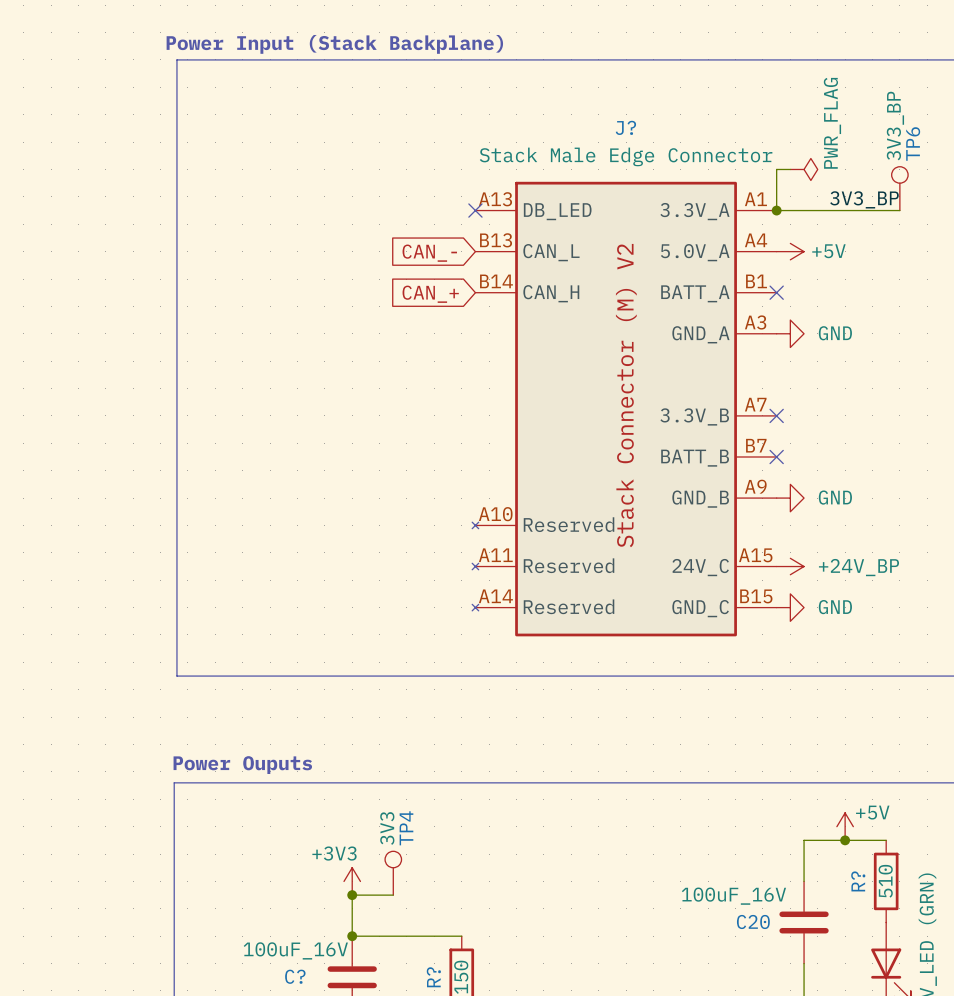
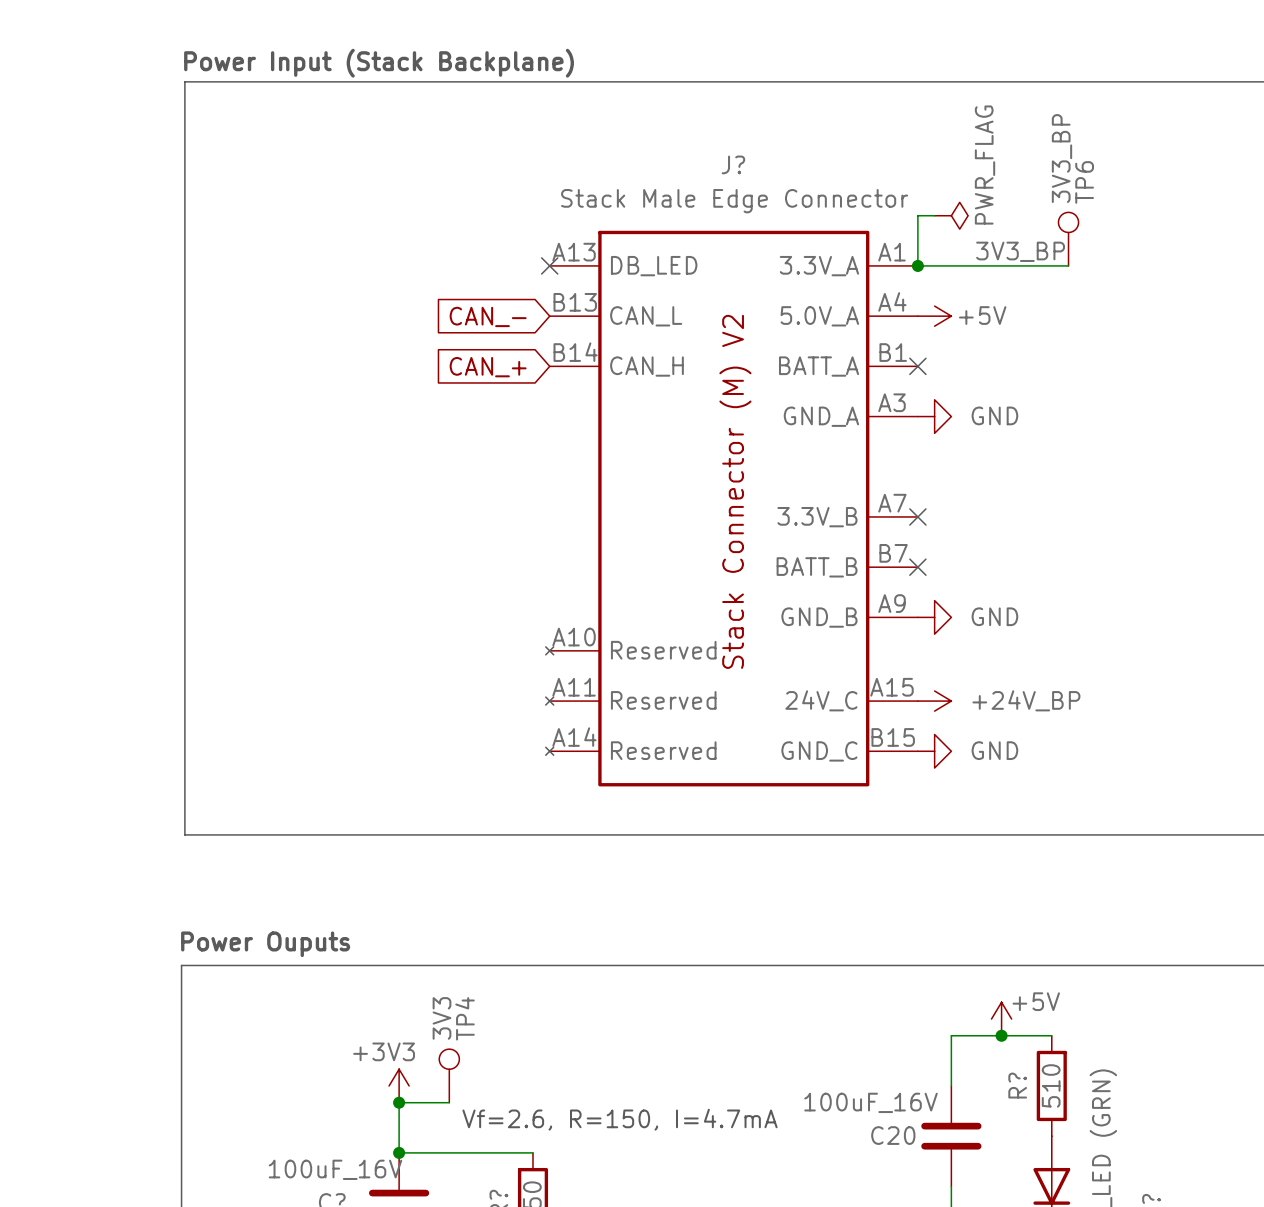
text: none -> Vf=2.6, R=150, I=4.7mA (620, 1119)

